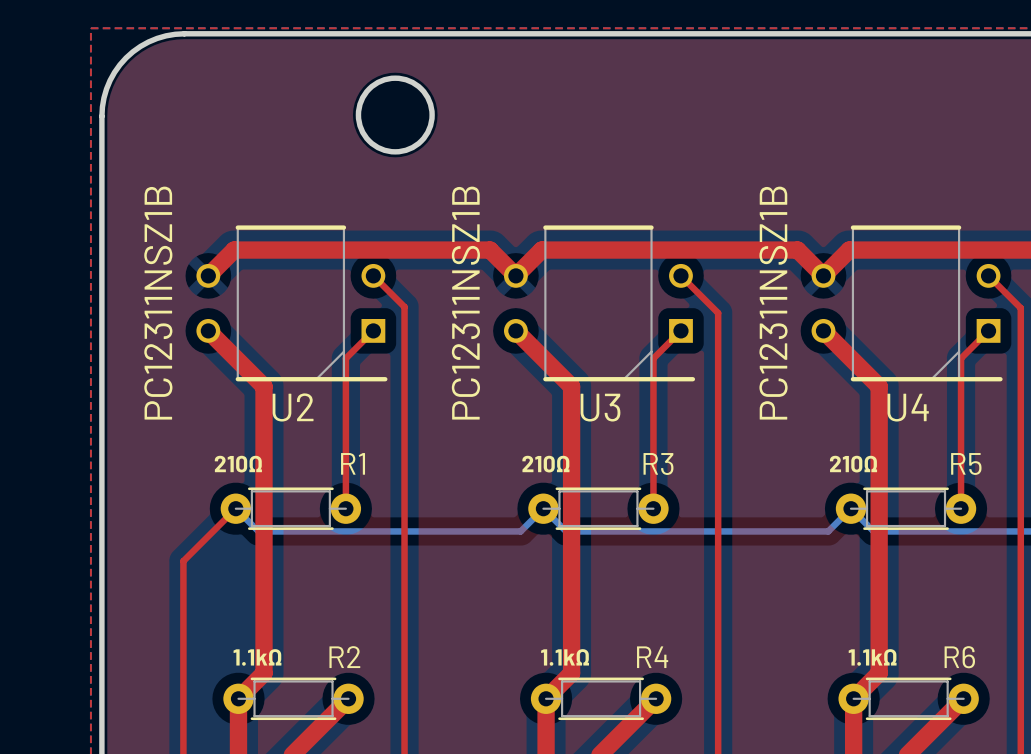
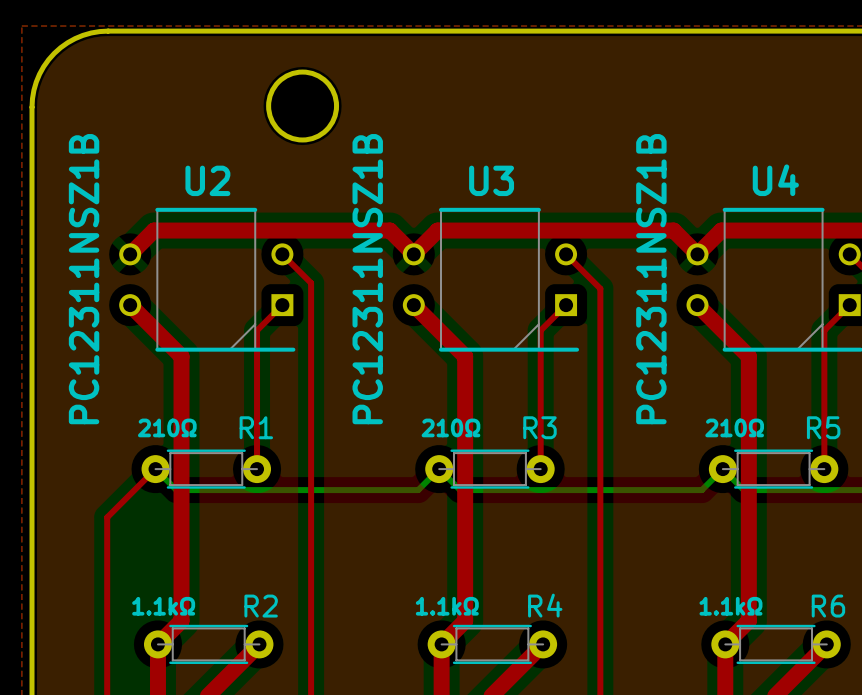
U2 name position: U2 (293, 407) -> U2 (207, 180)
U3 name position: U3 (600, 407) -> U3 (491, 180)
U4 name position: U4 (908, 407) -> U4 (775, 180)

